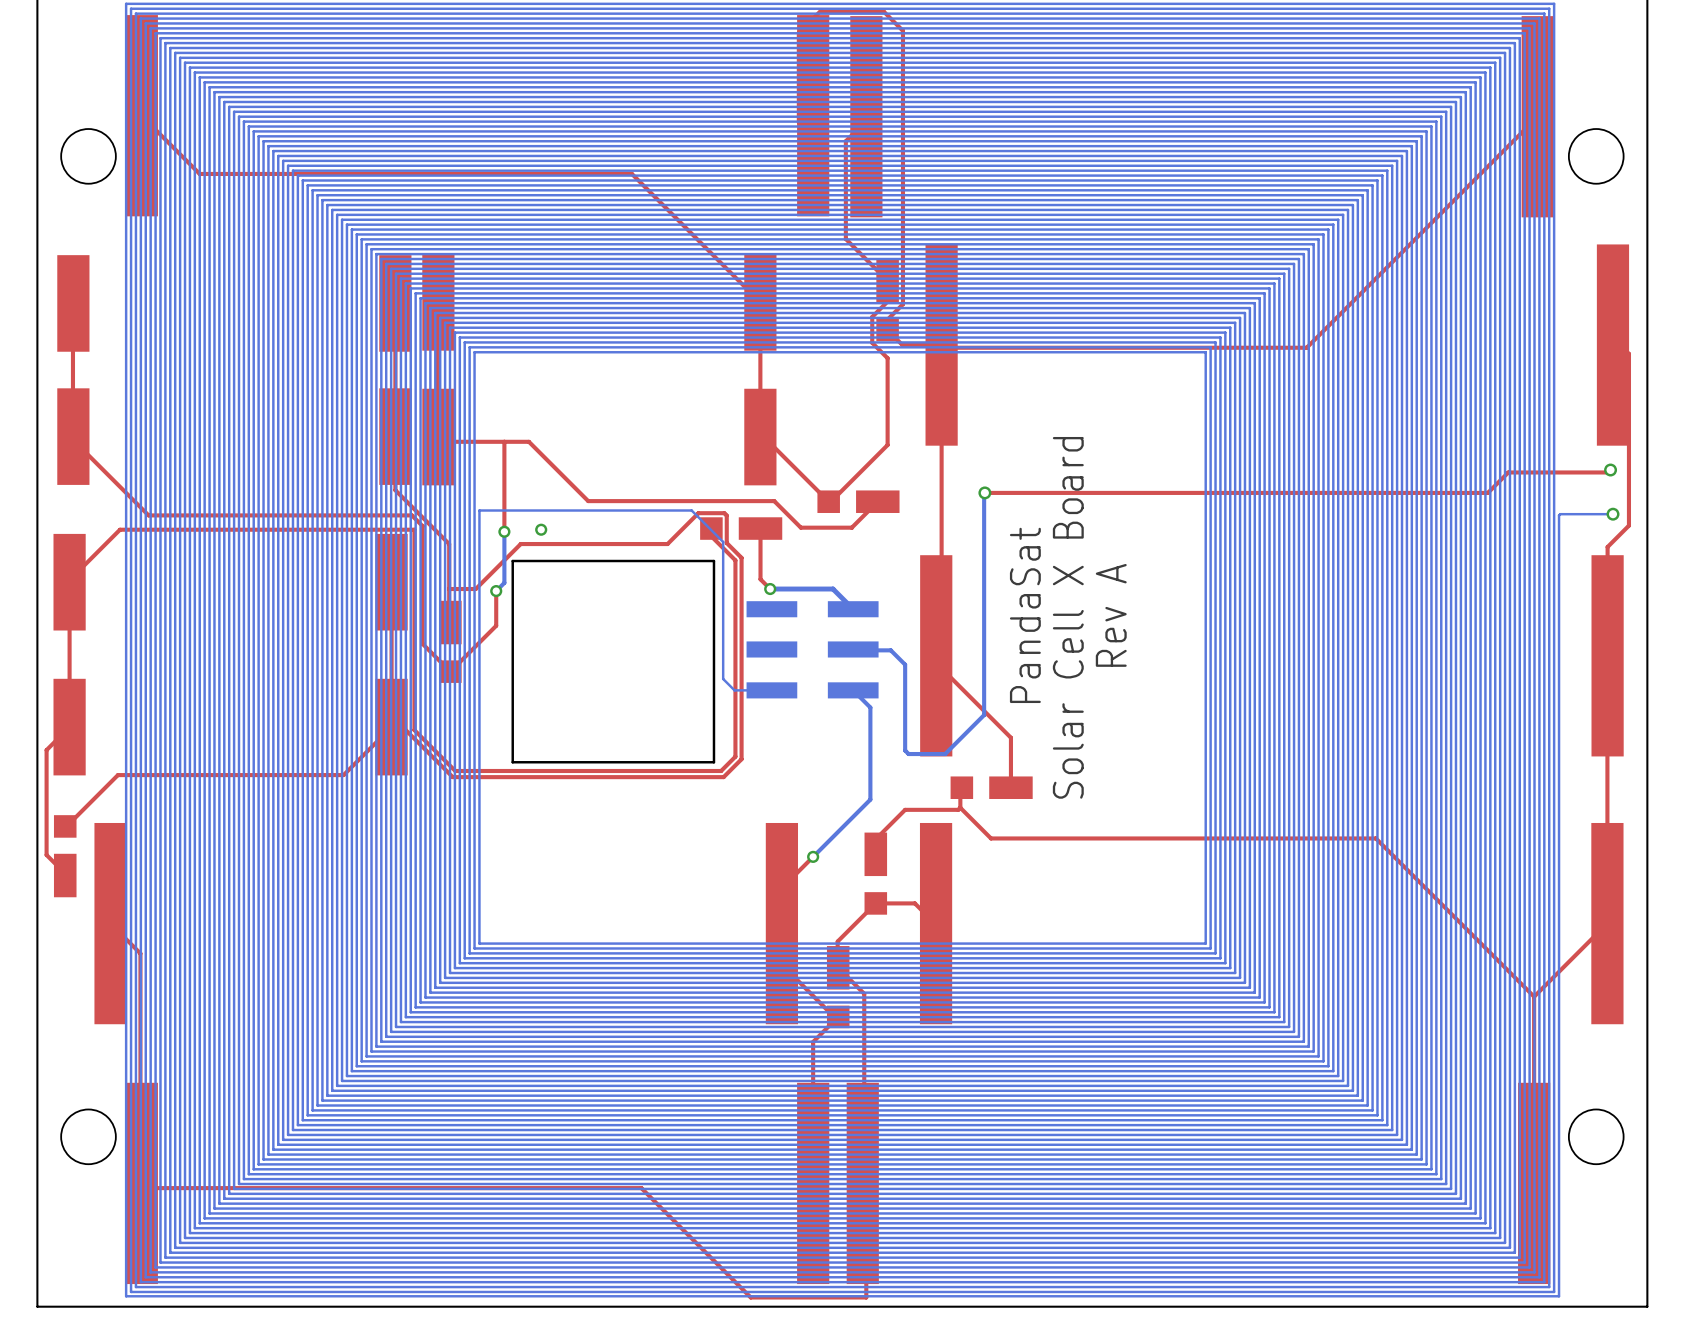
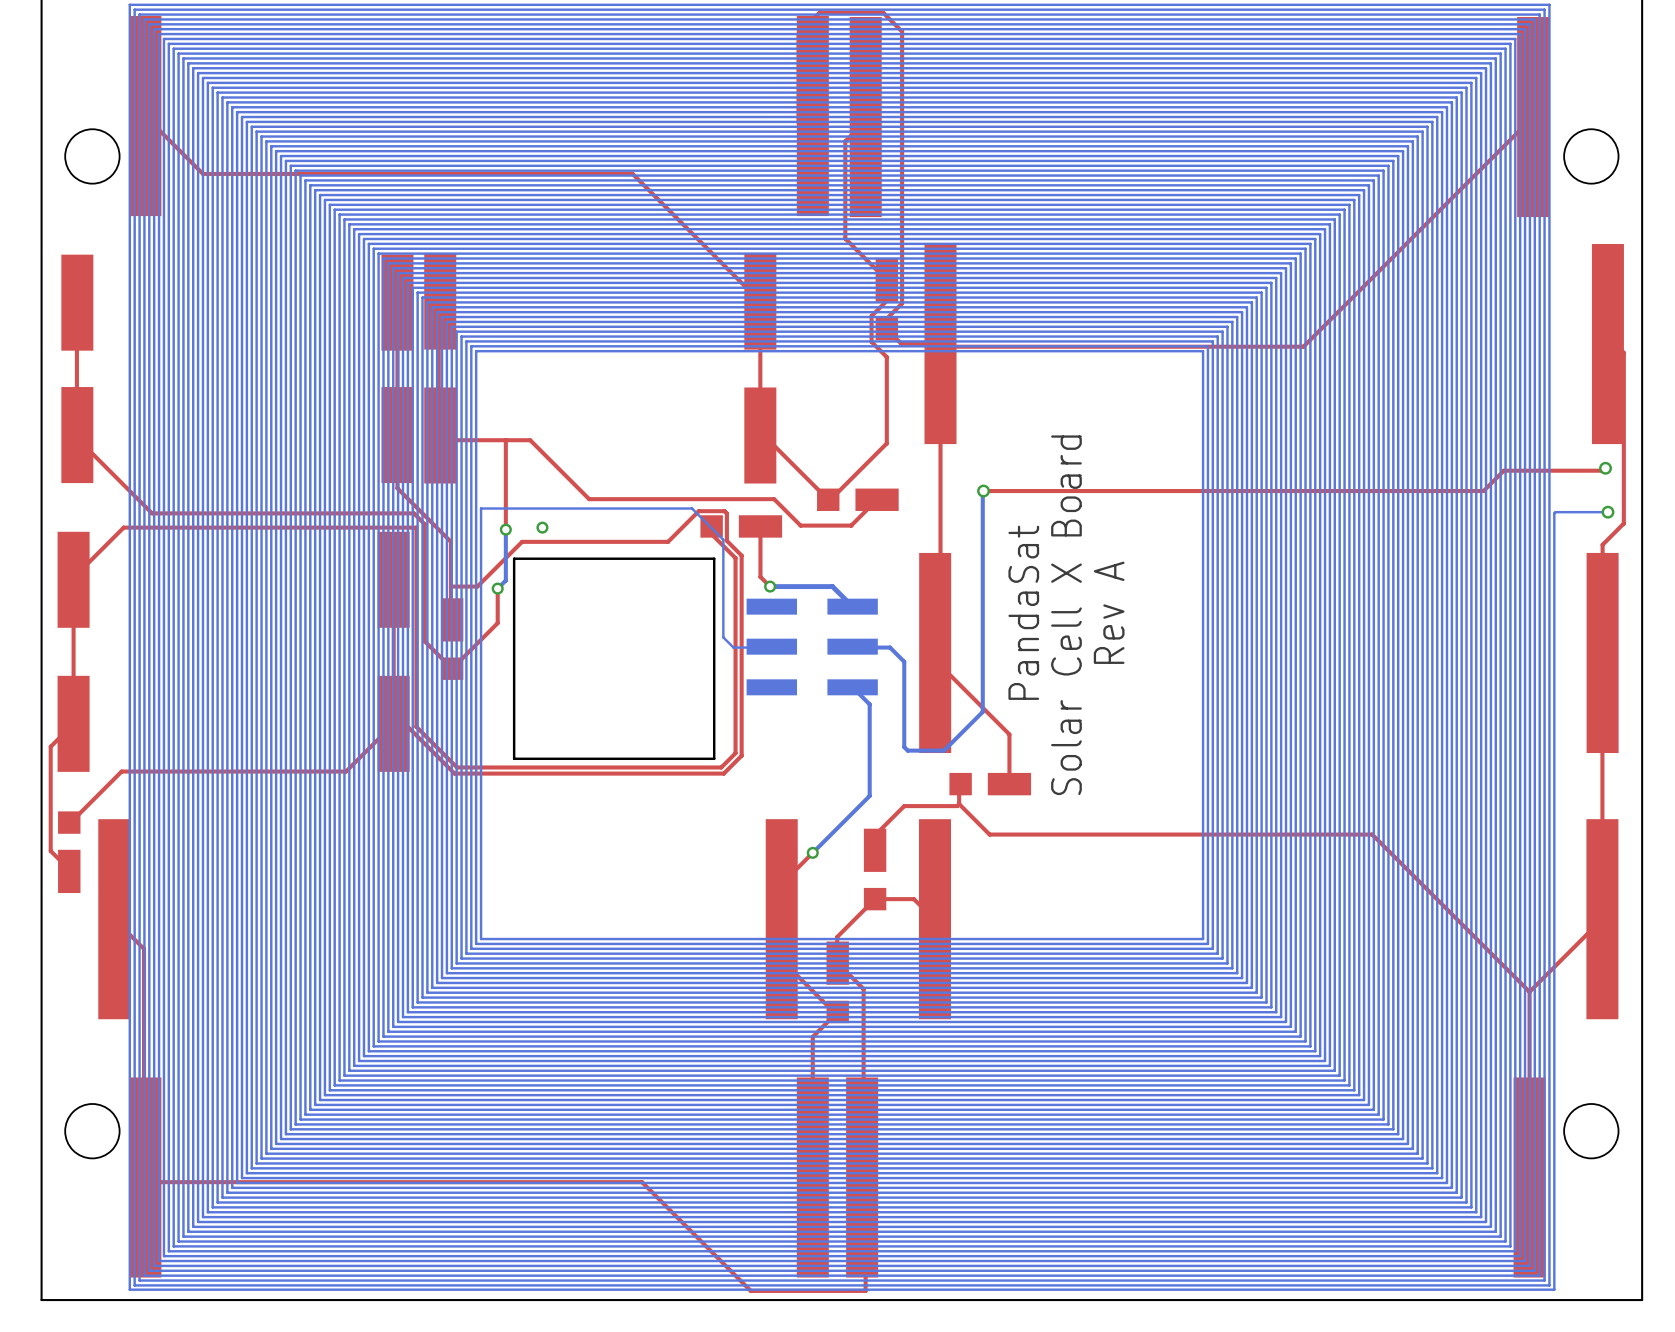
bottom track: (723, 640) (723, 678) (734, 690) (771, 690) -> (723, 637) (733, 647) (772, 647)

